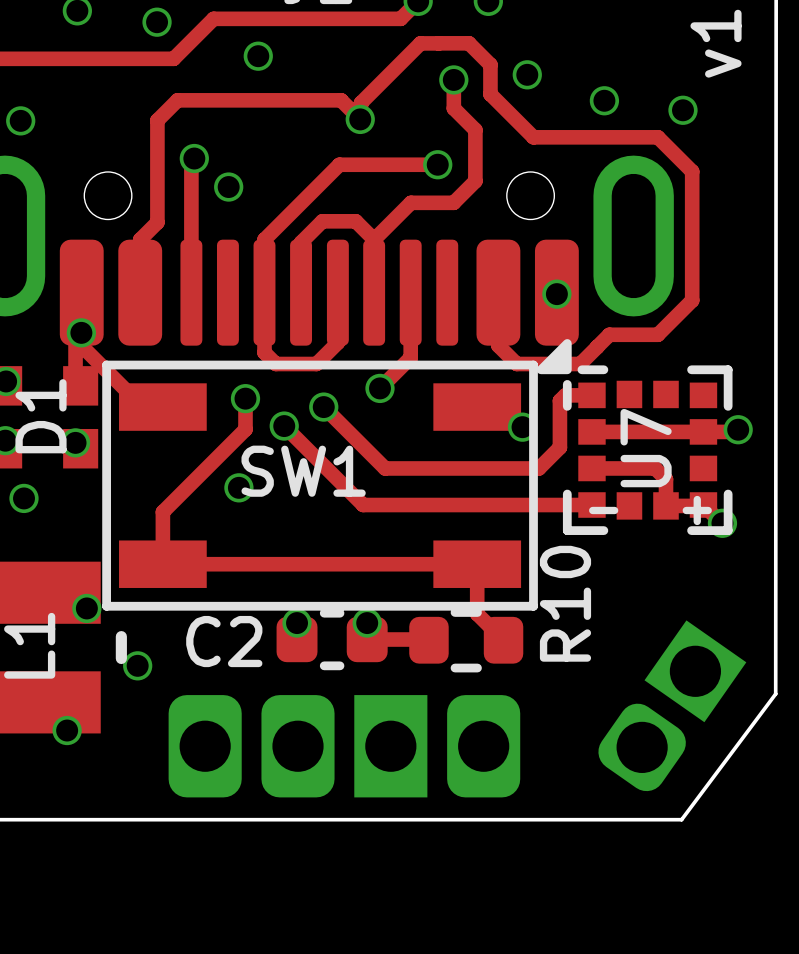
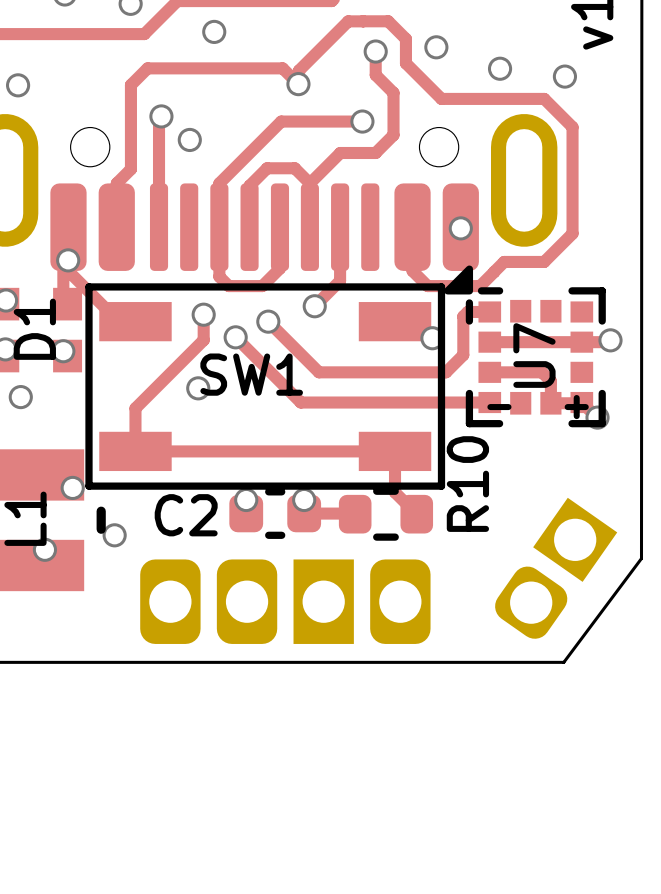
via position: (67, 730) -> (44, 549)

